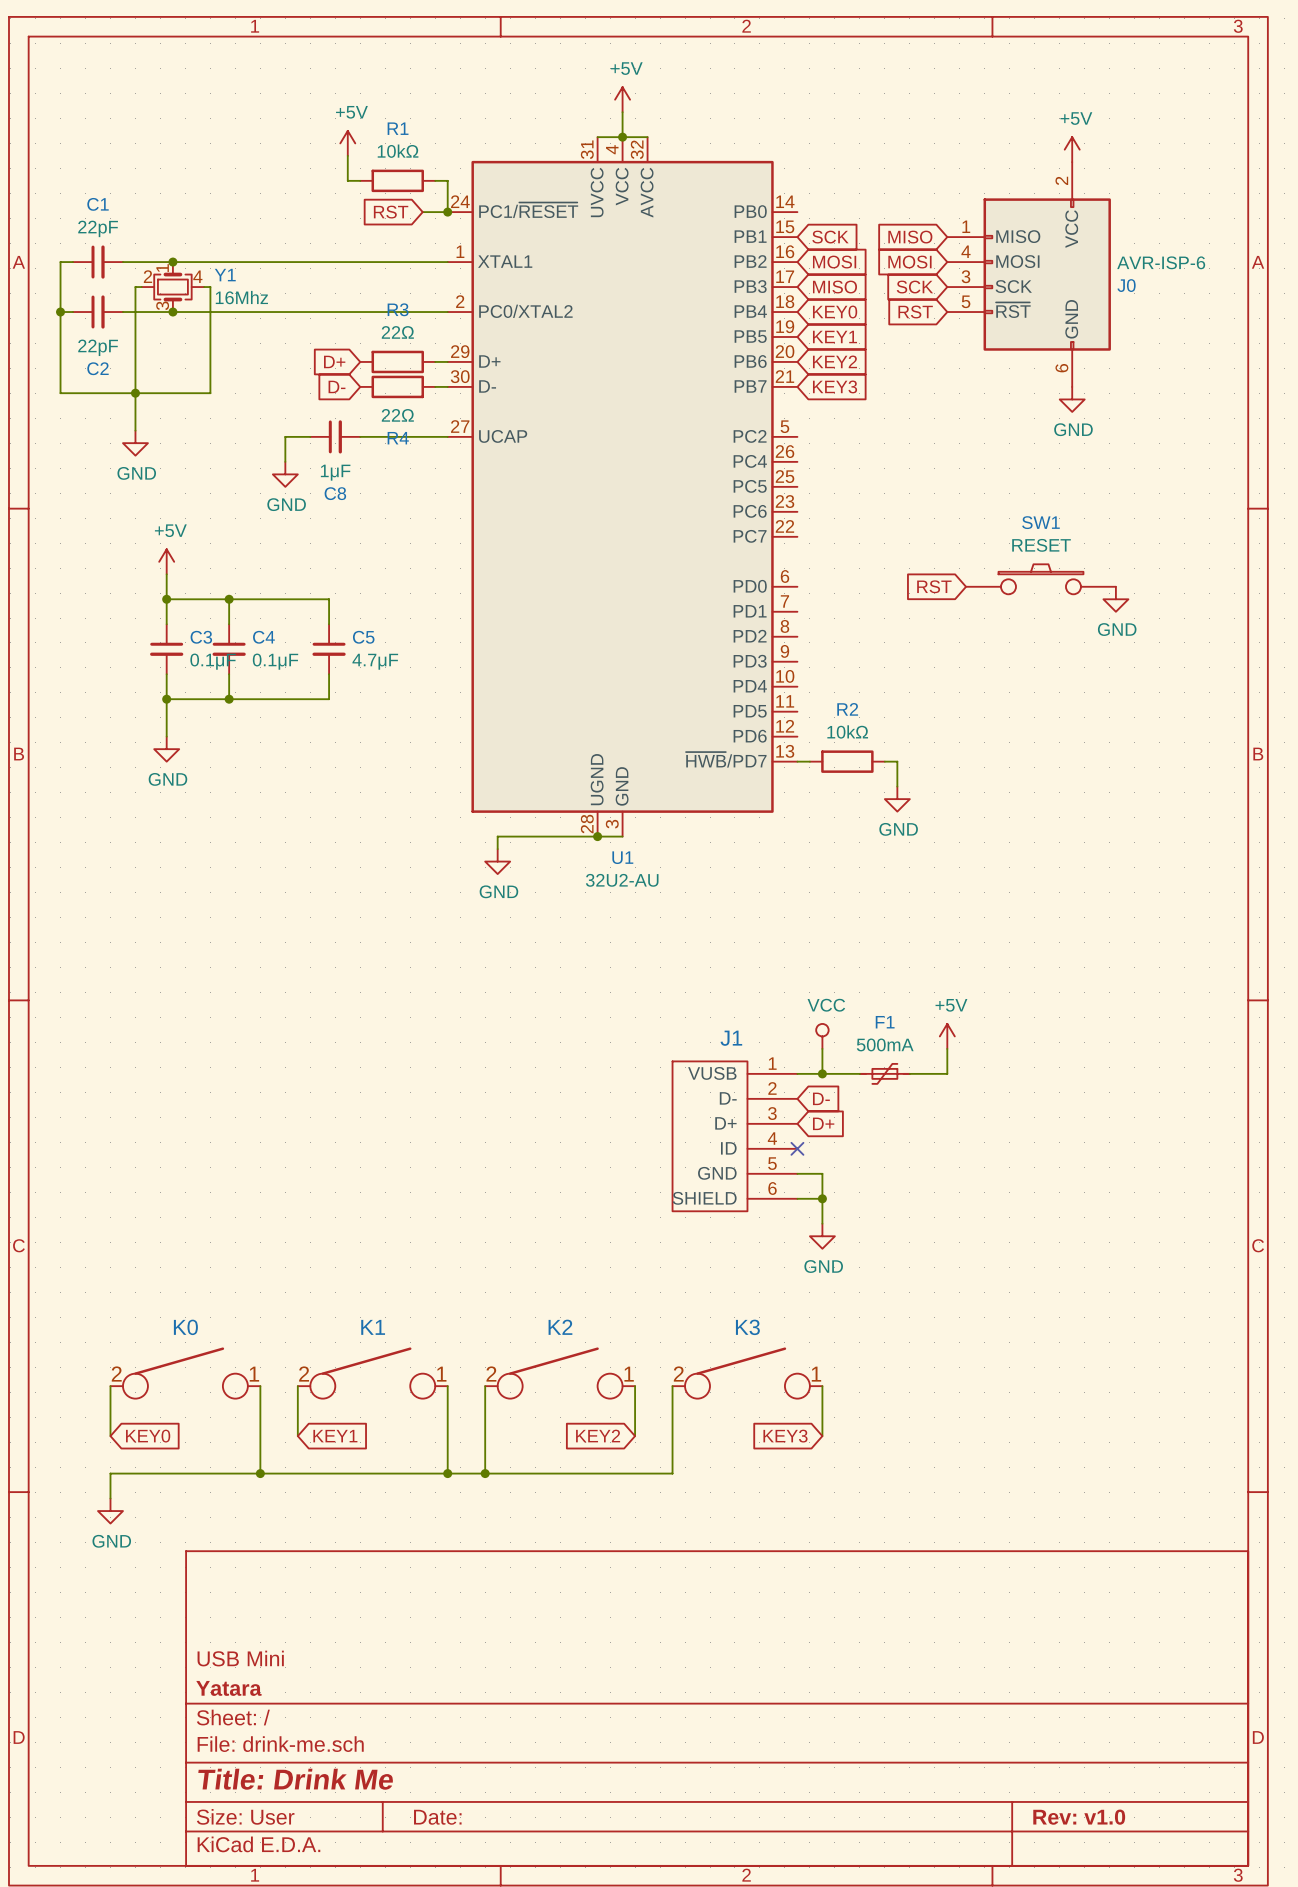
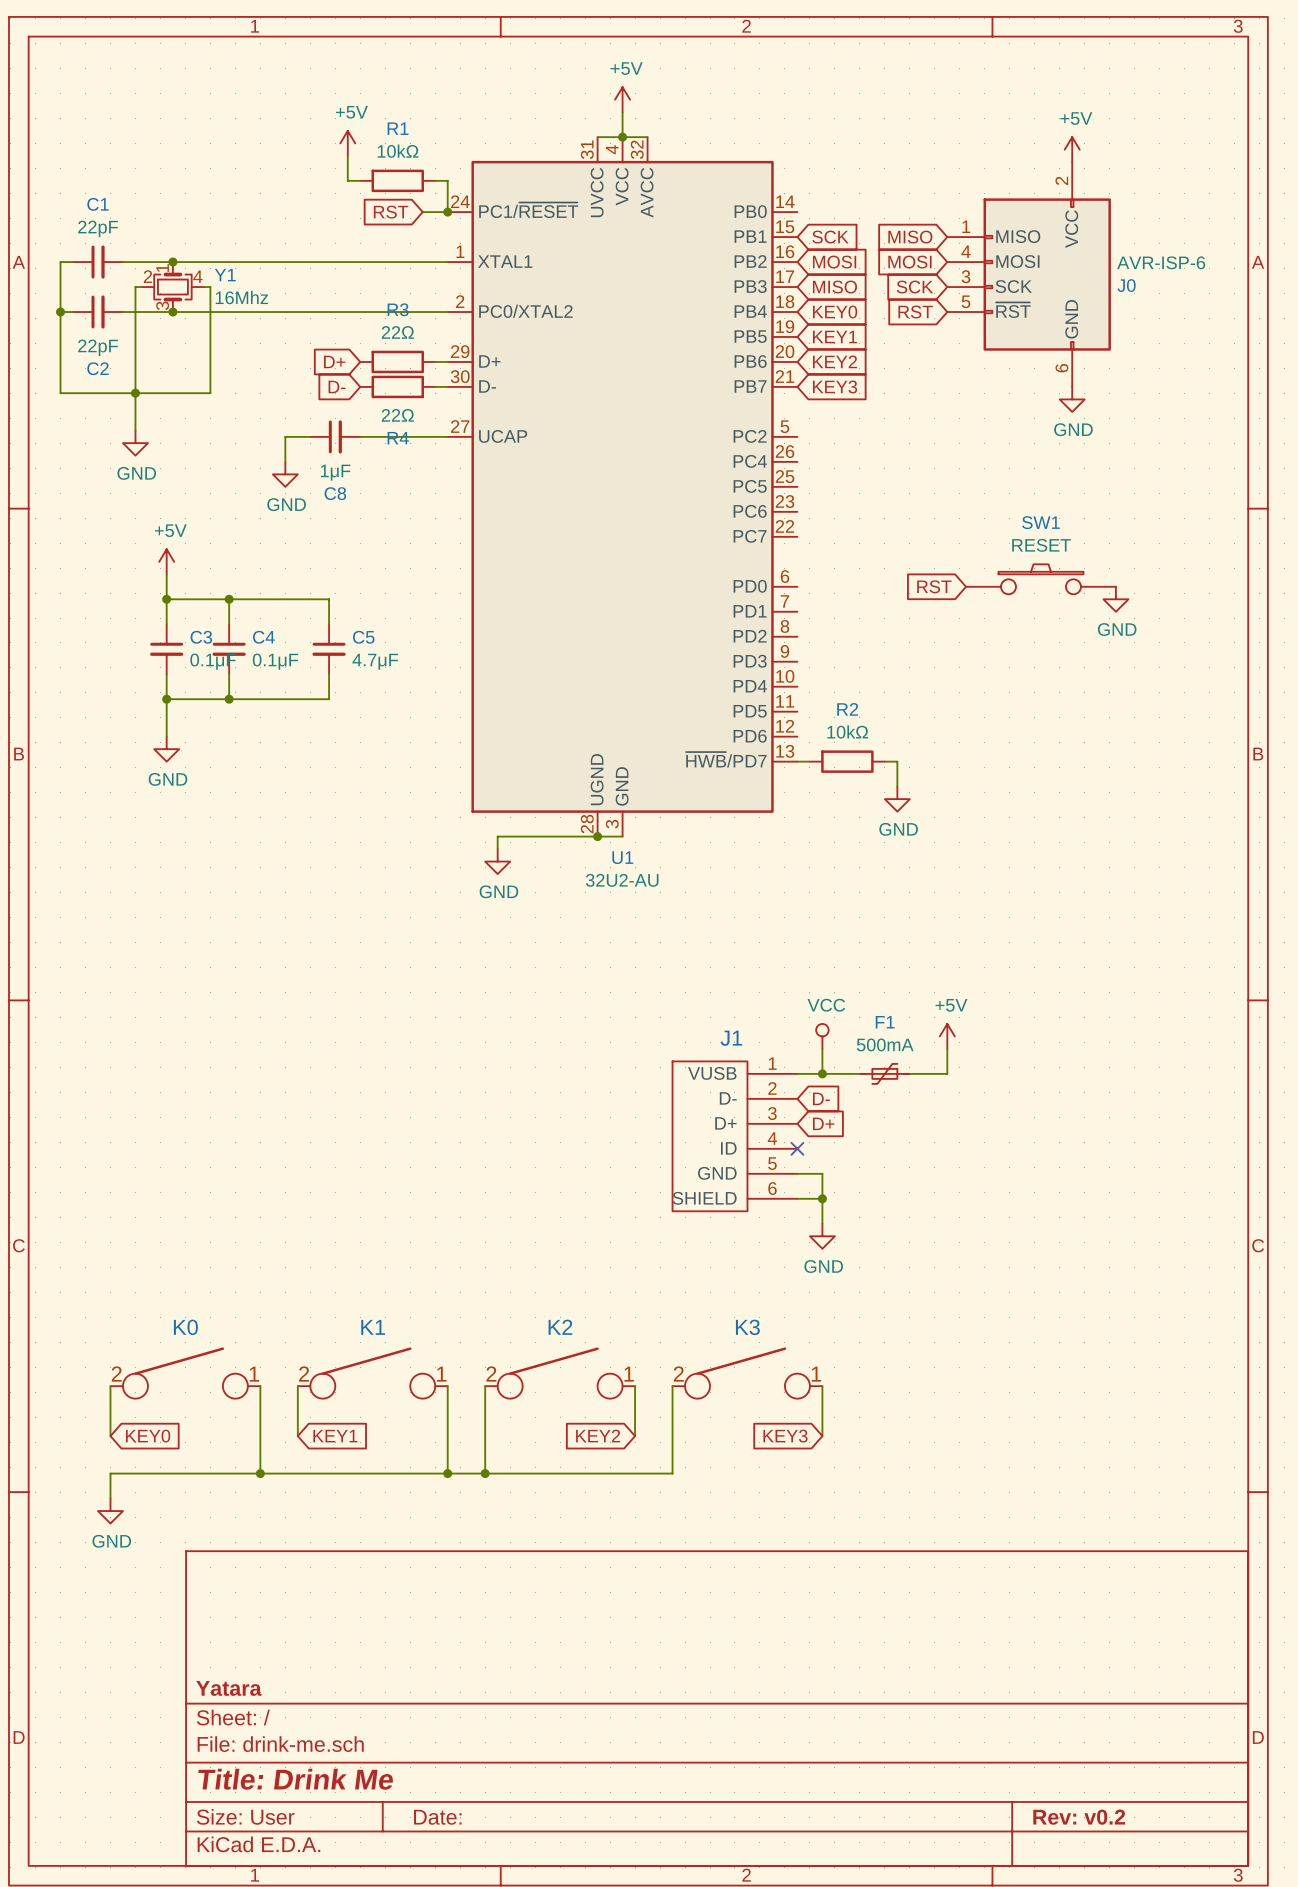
title block: USB Mini (240, 1658) -> none
title block: Rev: v1.0 (1079, 1817) -> Rev: v0.2 (1079, 1817)

